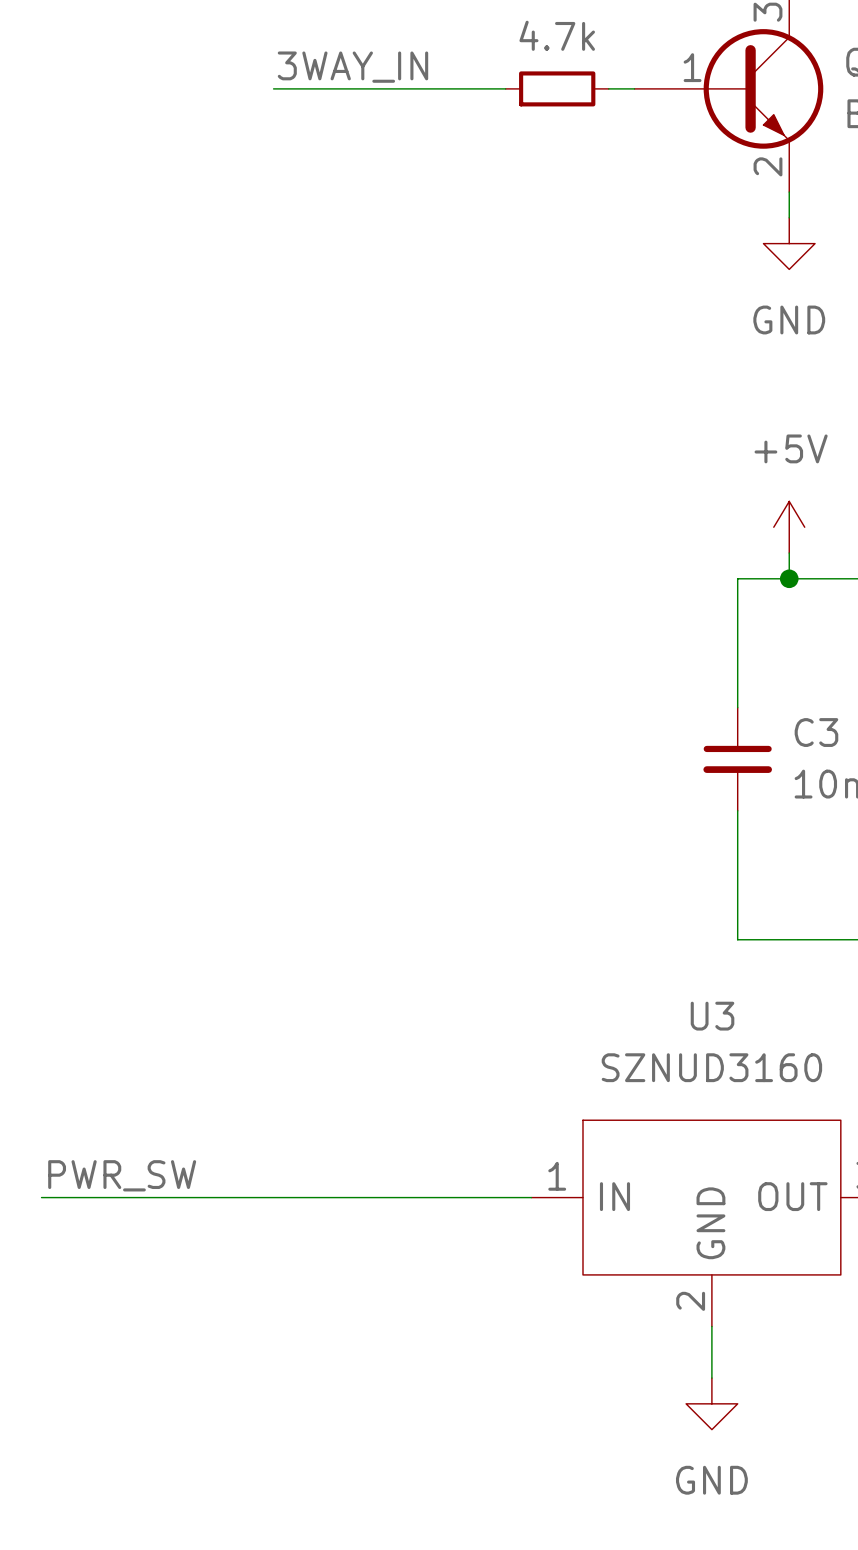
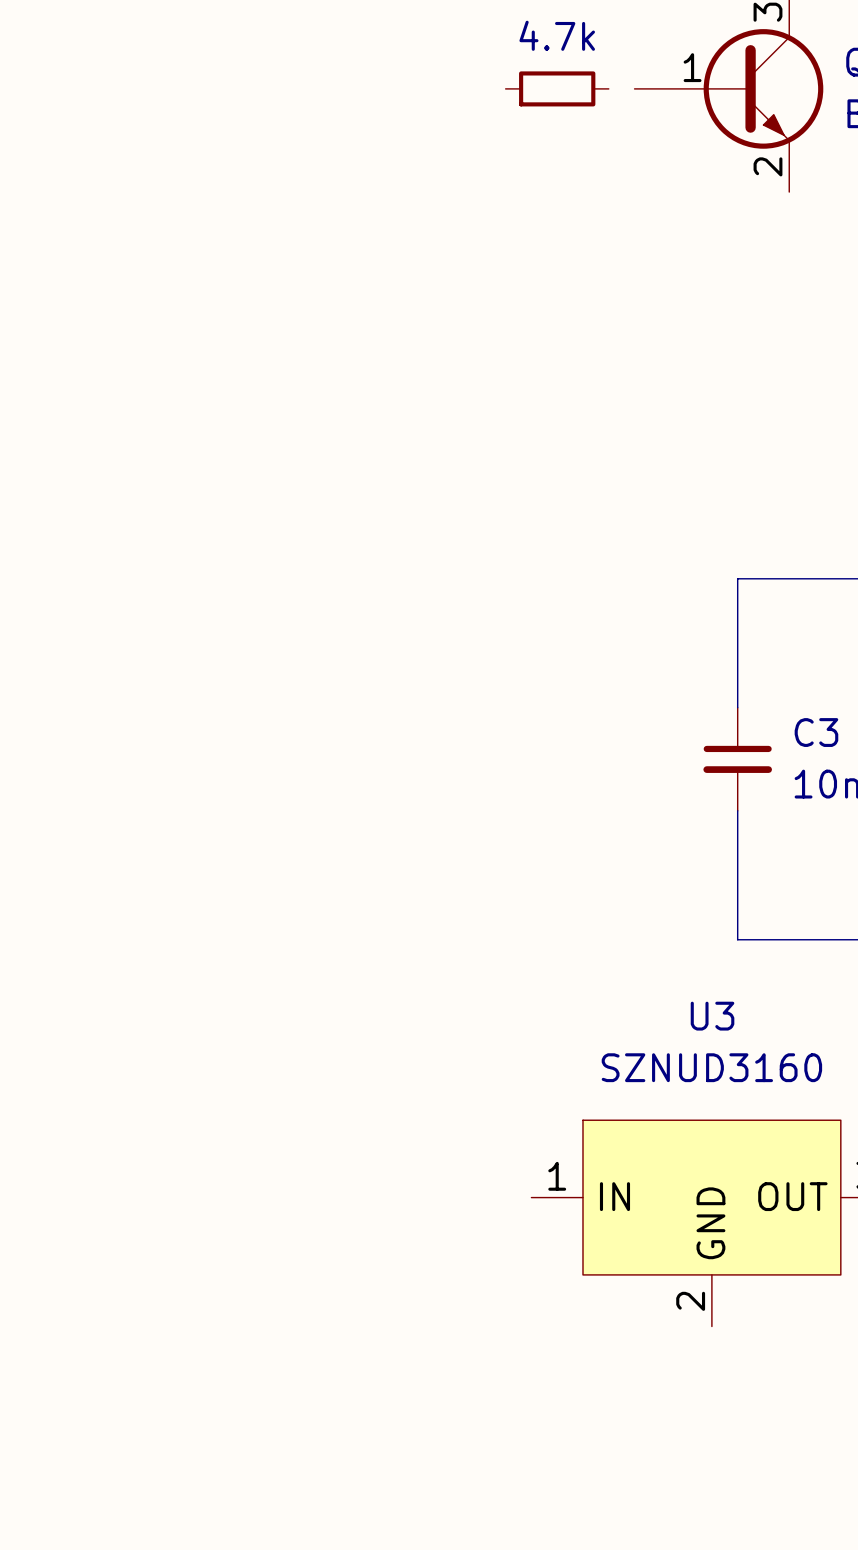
label: 3WAY_IN (352, 67) -> none
wire: (273, 88) (505, 88) -> none
wire: (608, 88) (634, 88) -> none
wire: (789, 192) (789, 217) -> none
power symbol: GND (789, 243) -> none
power symbol: +5V (789, 527) -> none
wire: (789, 553) (789, 578) -> none
junction: (789, 578) -> none
label: PWR_SW (122, 1175) -> none
wire: (41, 1197) (531, 1197) -> none
wire: (711, 1326) (711, 1378) -> none
power symbol: GND (711, 1403) -> none

